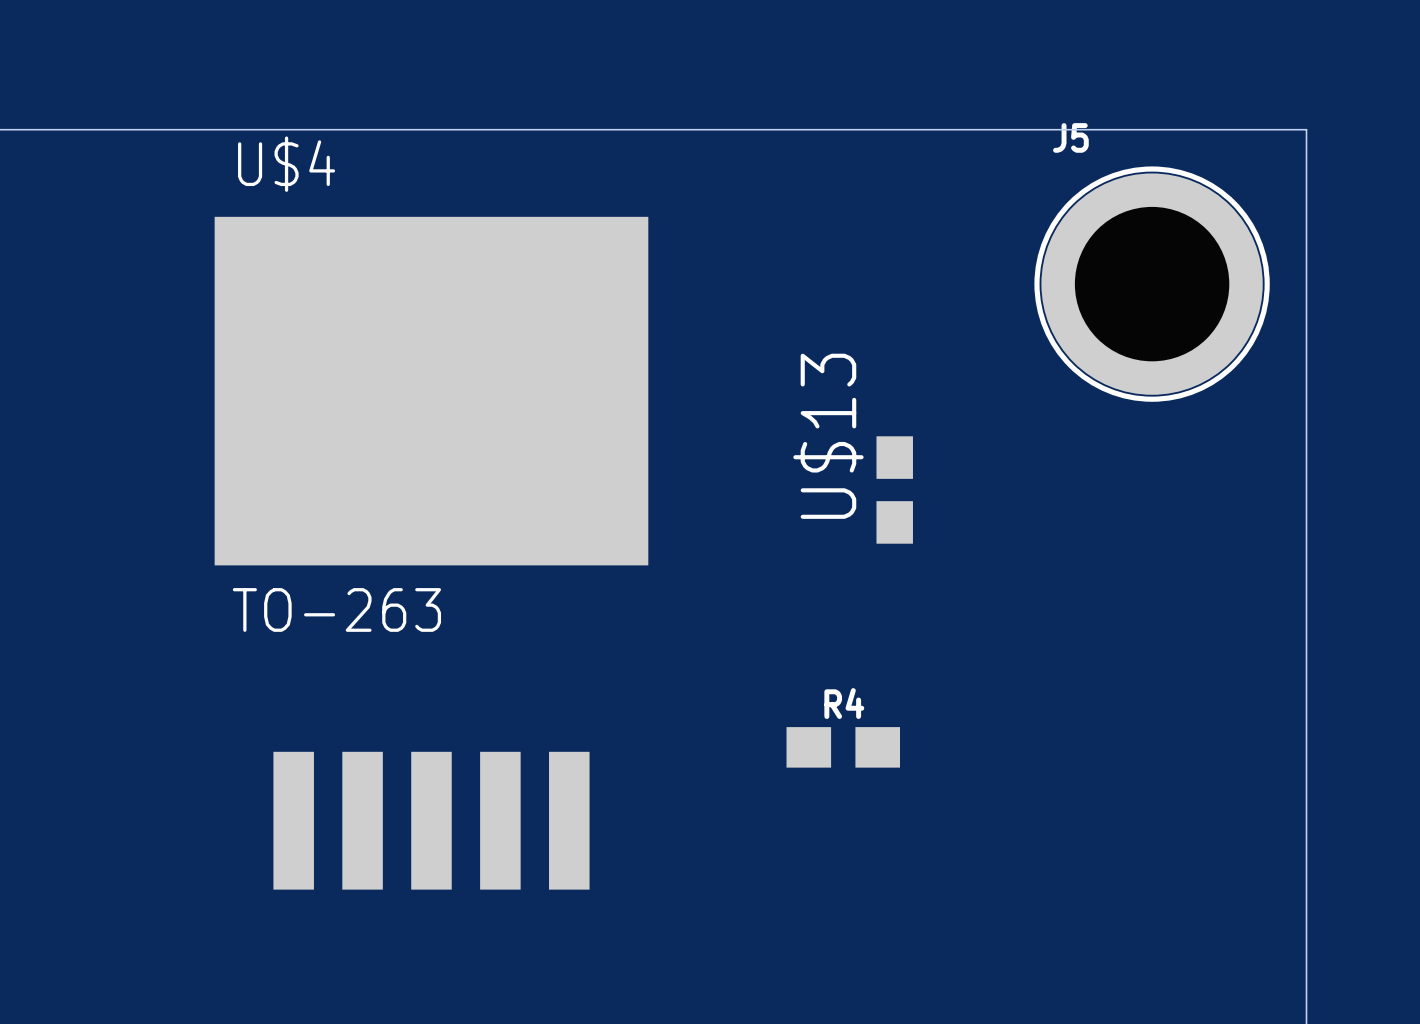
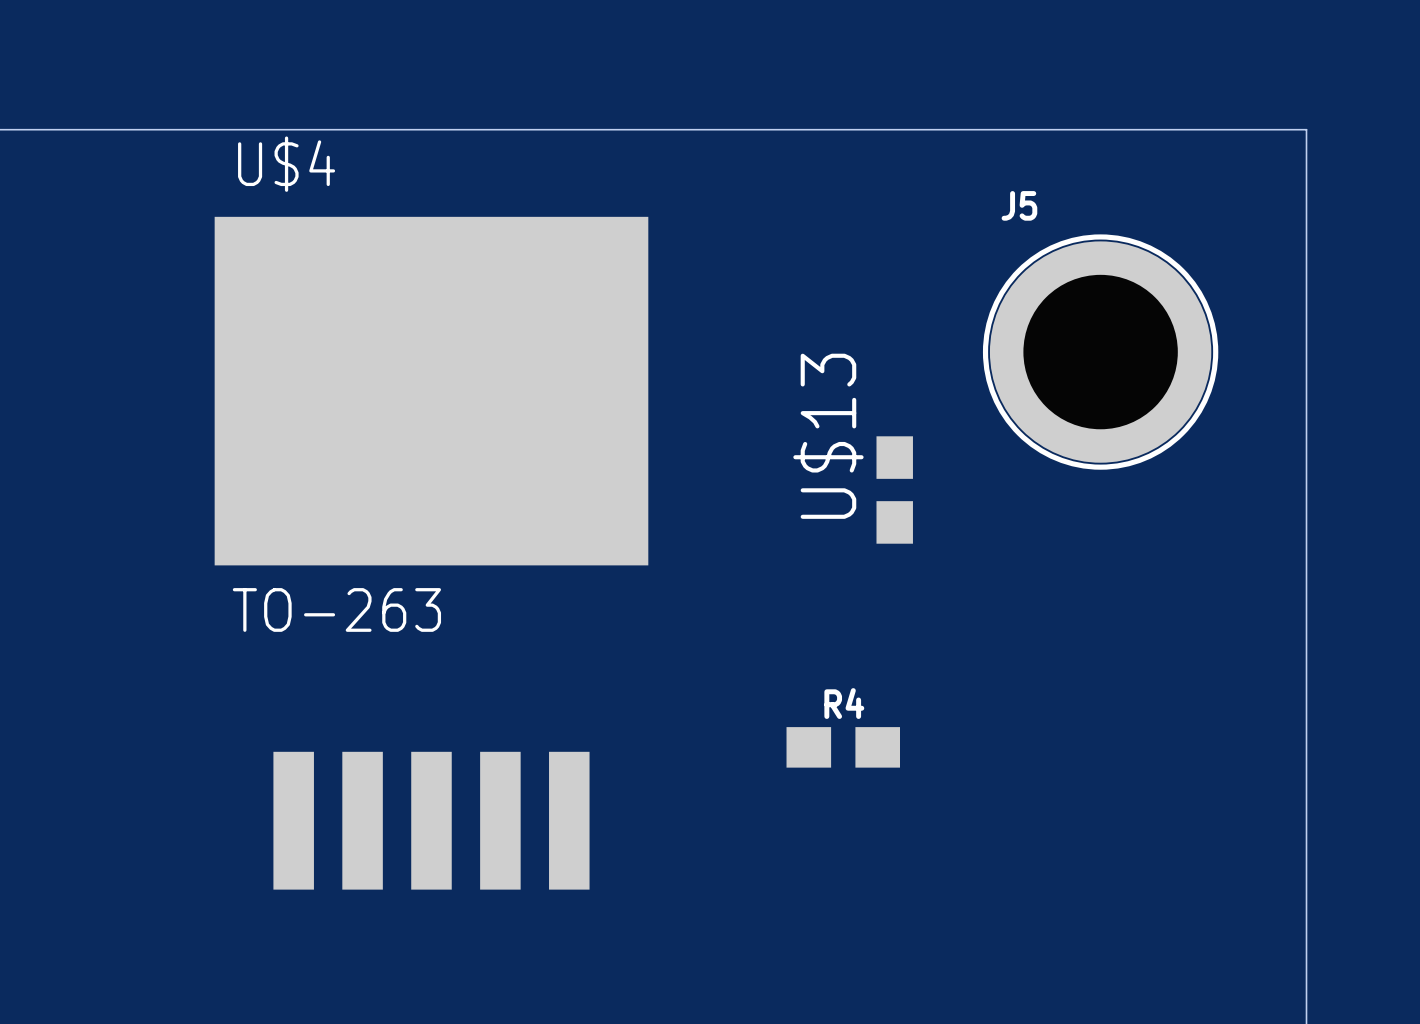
J5 position: (1152, 284) -> (1100, 352)

